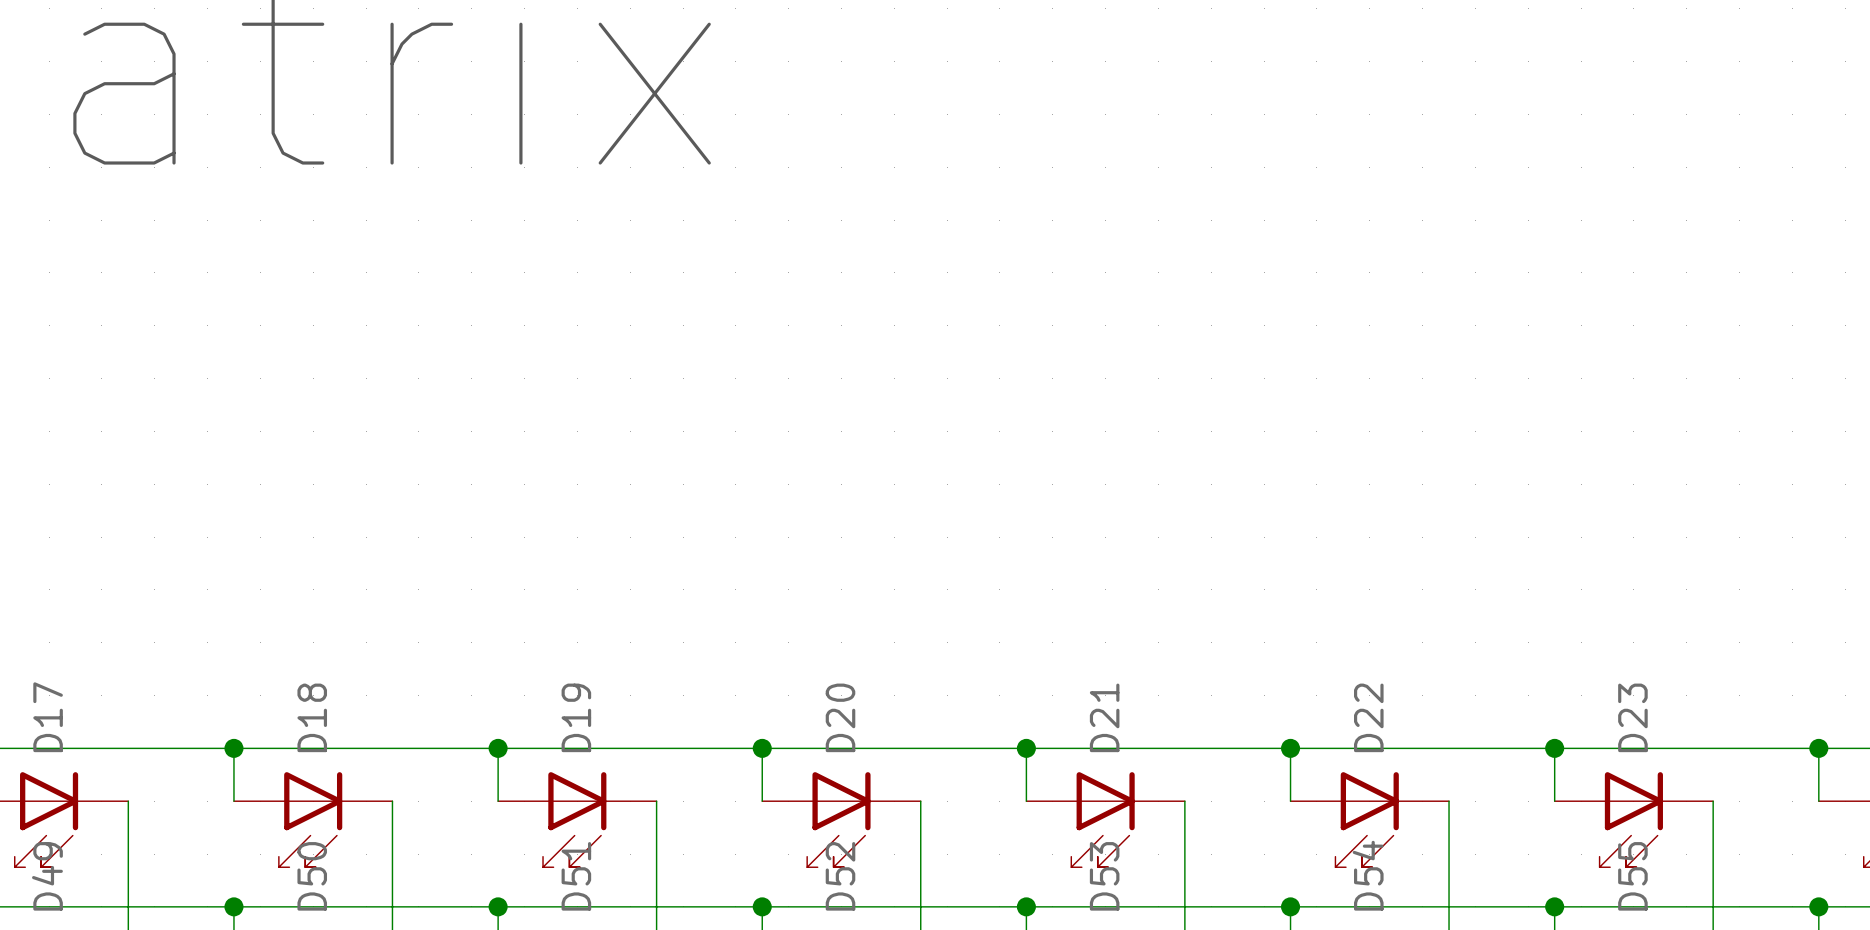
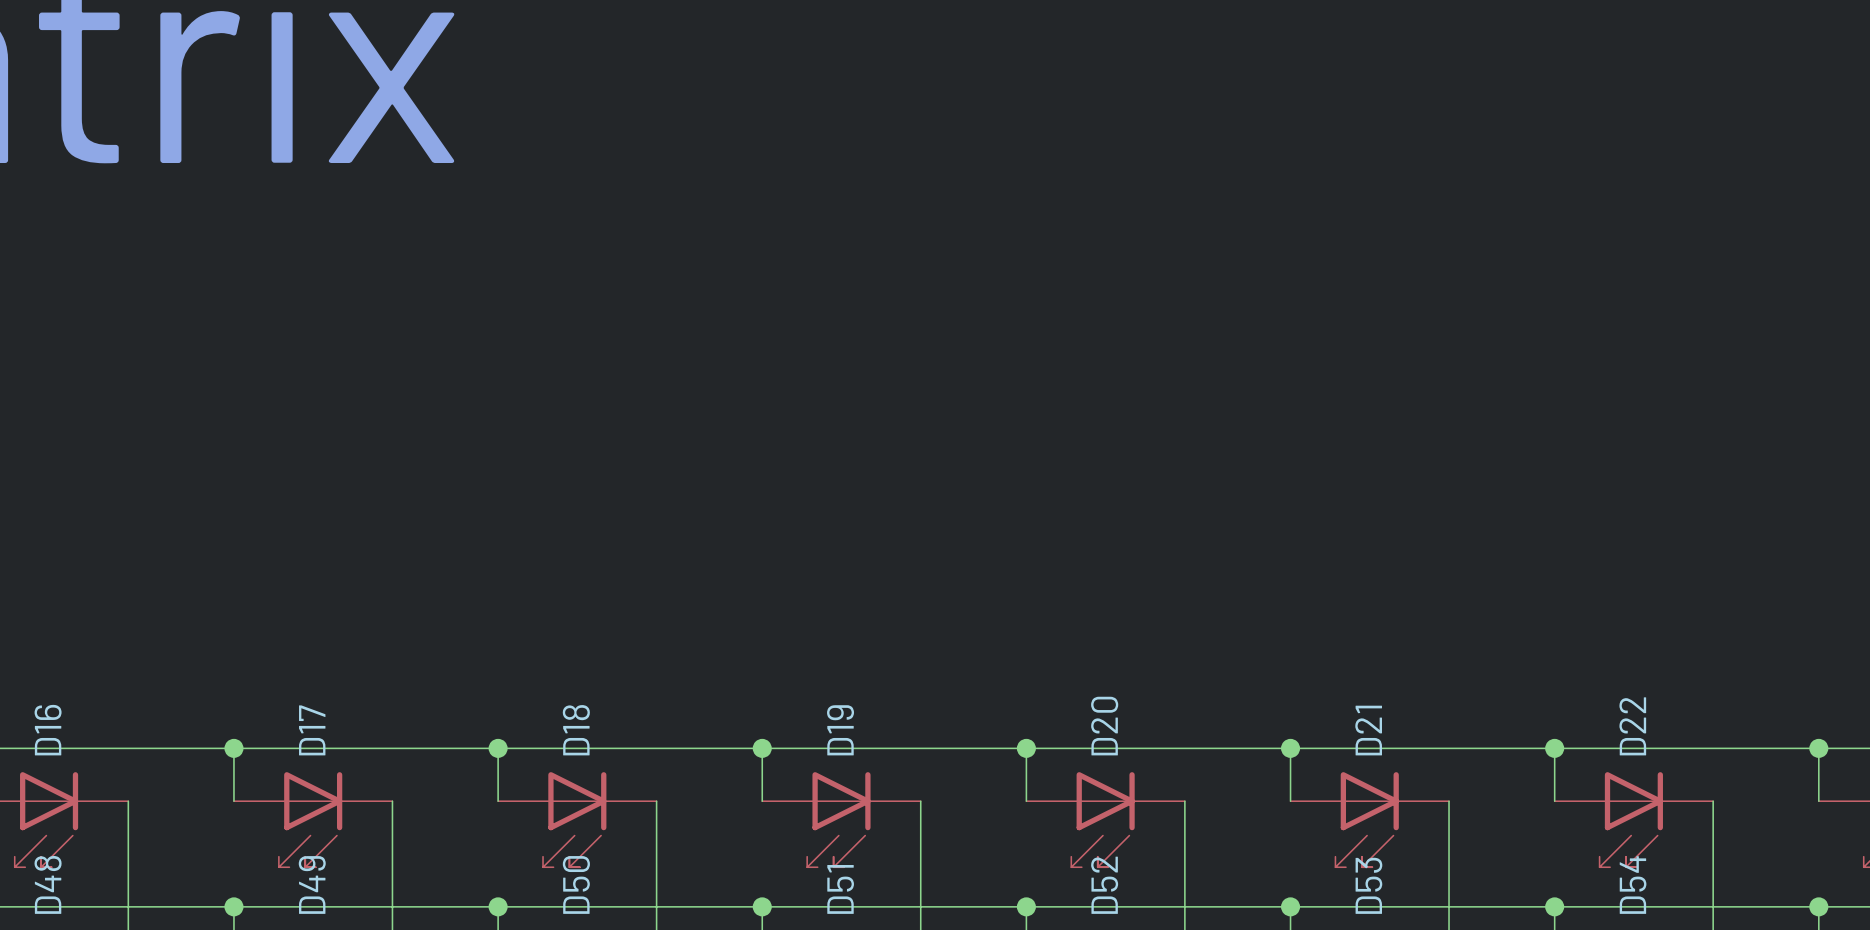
D17 name: D17 (48, 717) -> D16 (48, 730)
D18 name: D18 (312, 717) -> D17 (312, 730)
D19 name: D19 (576, 717) -> D18 (576, 730)
D20 name: D20 (840, 717) -> D19 (840, 730)
D21 name: D21 (1104, 717) -> D20 (1104, 726)
D22 name: D22 (1368, 717) -> D21 (1368, 730)
D23 name: D23 (1632, 717) -> D22 (1632, 726)
D54 name: D54 (1368, 875) -> D53 (1368, 885)
D49 name: D49 (47, 876) -> D48 (48, 884)
D50 name: D50 (312, 876) -> D49 (312, 884)
D51 name: D51 (576, 876) -> D50 (576, 884)
D52 name: D52 (840, 876) -> D51 (840, 889)
D53 name: D53 (1104, 876) -> D52 (1104, 885)
D55 name: D55 (1632, 876) -> D54 (1633, 885)

